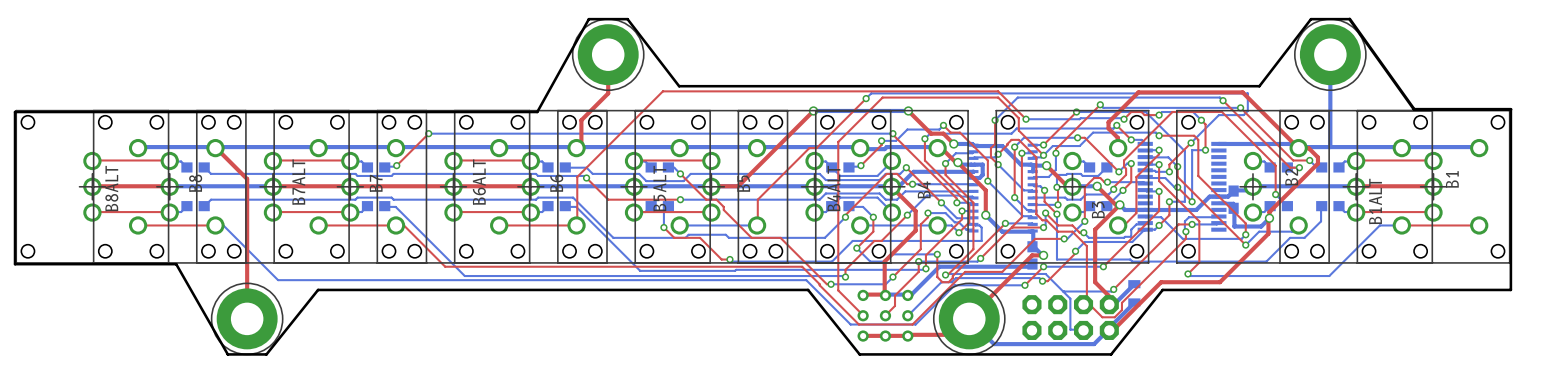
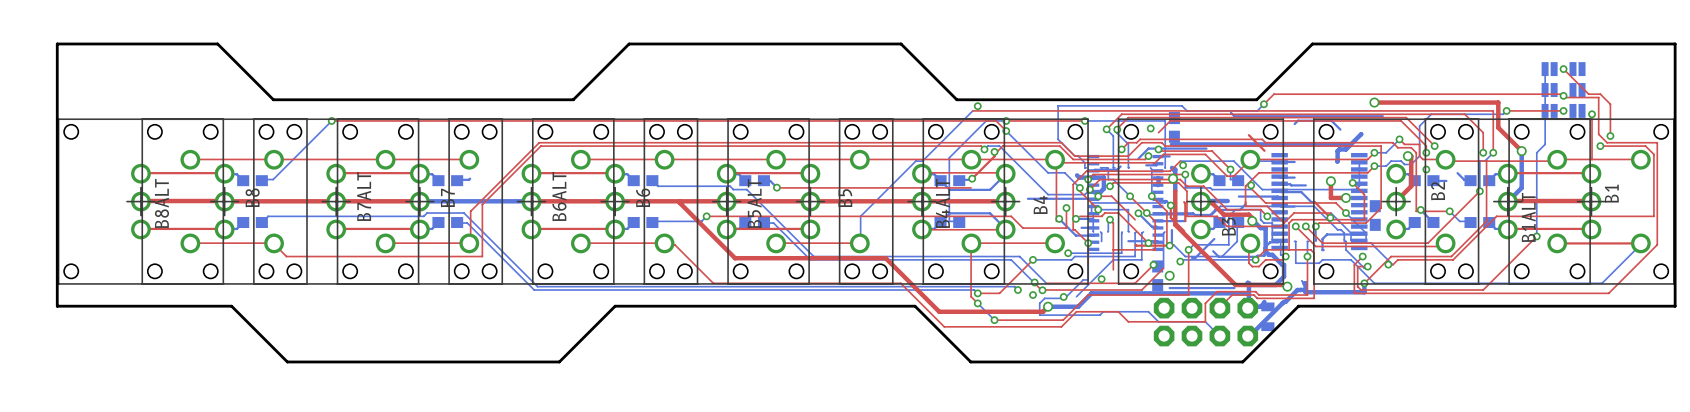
top track: (608, 54) (608, 93) (581, 120) (581, 143) (576, 148) -> none
part: (608, 54) -> none
bottom track: (1330, 54) (1330, 147) -> none
part: (1330, 54) -> none
bottom track: none -> (1545, 69) (1545, 144) (1536, 152) (1536, 236)
part: none -> (1549, 69)
top track: none -> (1563, 69) (1588, 94) (1600, 94) (1610, 104) (1610, 136)
via: none -> (1563, 69)
part: none -> (1577, 69)
part: none -> (1549, 90)
part: none -> (1577, 90)
via: none -> (1563, 95)
top track: none -> (1374, 102) (1498, 102) (1498, 127) (1521, 151)
via: none -> (1374, 102)
bottom track: none -> (1263, 104) (1257, 110) (1186, 110) (1181, 105) (1058, 105) (1058, 139) (1074, 156) (1078, 156) (1084, 162) (1086, 167)
top track: none -> (1263, 104) (1274, 94) (1561, 94) (1565, 97) (1598, 97) (1598, 134) (1607, 142) (1657, 142) (1657, 244) (1608, 293) (1354, 293) (1354, 264) (1362, 256)
via: none -> (1263, 104)
bottom track: (866, 98) (871, 93) (1247, 93) (1247, 110) (1243, 115) (1218, 115) (1191, 142) -> none
top track: (866, 98) (816, 148) (809, 148) (757, 199) (757, 225) -> (776, 243) (859, 243)
bottom track: (1223, 100) (1219, 97) (1017, 97) (995, 120) -> none
top track: (1223, 100) (1290, 167) (1299, 167) -> none
via: (1223, 100) -> none
top track: none -> (972, 110) (1493, 110) (1493, 152)
bottom track: none -> (1506, 110) (1503, 114) (1431, 114) (1419, 125) (1419, 156) (1411, 164) (1404, 164) (1401, 161) (1391, 161) (1386, 166) (1374, 166)
top track: none -> (1506, 110) (1563, 110)
via: none -> (1506, 110)
part: none -> (1549, 110)
via: none -> (1563, 110)
part: none -> (1577, 110)
top track: (1100, 104) (1055, 149) (1055, 153) -> none
via: (1100, 104) -> none
top track: none -> (1592, 114) (1592, 159)
via: none -> (1592, 114)
top track: (1240, 107) (1293, 160) (1309, 160) -> none
via: (1240, 107) -> none
board edge: (1510, 109) (1414, 109) (1349, 19) (1311, 19) (1259, 86) (679, 86) (627, 19) (588, 19) (537, 112) (15, 112) -> (1675, 117) (1675, 43) (1312, 43) (1256, 99) (956, 99) (901, 43) (629, 43) (573, 99) (273, 99) (217, 43) (57, 43) (57, 120)
bottom track: (813, 110) (908, 110) -> none
top track: (813, 110) (738, 186) (711, 186) -> (1005, 201) (810, 201)
via: (813, 110) -> none
top track: (908, 110) (931, 133) (943, 133) (953, 143) -> none
via: (908, 110) -> none
top track: none -> (331, 120) (996, 120) (1006, 131)
via: none -> (331, 120)
top track: none -> (1006, 120) (1084, 120)
via: none -> (1006, 120)
bottom track: none -> (1084, 120) (1165, 120) (1164, 167)
via: none -> (1084, 120)
bottom track: (1076, 112) (1145, 112) (1184, 151) (1184, 201) (1169, 201) -> none
top track: (1076, 112) (1043, 145) -> none
via: (1076, 112) -> none
top track: (1159, 115) (1144, 115) (1141, 112) (1131, 112) (1124, 119) -> none
via: (1159, 115) -> none
part: none -> (1174, 127)
bottom track: none -> (1106, 129) (1113, 136) (1113, 167) (1114, 167)
top track: none -> (1106, 129) (1121, 114) (1464, 114) (1483, 132) (1483, 152)
via: none -> (1106, 129)
bottom track: none -> (1116, 129) (1116, 132) (1128, 142) (1129, 167)
top track: none -> (1116, 129) (1128, 117) (1406, 117) (1434, 146)
bottom track: (1026, 119) (1124, 119) -> none
top track: (1026, 119) (998, 91) (662, 91) (577, 176) (577, 225) (499, 225) -> (1307, 256) (1307, 295) (1258, 295) (1255, 291) (1217, 291) (1205, 303) (1205, 321) (1128, 321) (1118, 311) (1076, 311) (1061, 326) (944, 326) (900, 283) (713, 283) (674, 244) (580, 243)
via: (1124, 119) -> none
top track: (995, 120) (995, 143) (990, 148) (990, 157) (998, 164) -> none
top track: (1201, 120) (1205, 124) (1205, 150) -> none
via: (1201, 120) -> none
bottom track: none -> (1006, 131) (1048, 172) (1064, 172) (1079, 187)
via: none -> (1006, 131)
top track: none -> (1158, 132) (1170, 120) (1401, 120) (1426, 146) (1426, 152)
bottom track: none -> (1361, 134) (1345, 149) (1337, 151) (1337, 161)
bottom track: (943, 125) (939, 129) (907, 129) (896, 140) (881, 140) -> none
top track: (943, 125) (950, 132) (960, 132) (987, 160) (987, 181) -> none
via: (943, 125) -> none
bottom track: (1116, 125) (1113, 128) (1016, 128) (1011, 133) (930, 133) (924, 138) -> none
via: (1116, 125) -> none
via: none -> (1610, 136)
bottom track: none -> (1399, 139) (1386, 152) (1374, 152)
top track: none -> (1399, 139) (1404, 144) (1419, 144) (1419, 156) (1422, 159) (1444, 159) (1446, 161) (1640, 159)
via: none -> (1399, 139)
bottom track: (428, 133) (892, 133) -> none
top track: (428, 133) (396, 165) -> none
via: (428, 133) -> none
top track: (892, 133) (956, 198) (956, 202) -> none
via: (892, 133) -> none
bottom track: none -> (1171, 144) (1350, 145)
bottom track: (1159, 135) (1156, 132) (1093, 132) (1079, 146) (1052, 146) (1041, 157) (1032, 158) -> none
top track: (1159, 135) (1194, 135) (1198, 139) (1198, 175) (1245, 223) (1245, 234) -> none
via: (1159, 135) -> none
via: none -> (1434, 146)
top track: none -> (1600, 146) (1645, 146) (1653, 154) (1653, 216) (1496, 216) (1453, 259) (1397, 259) (1392, 264)
via: none -> (1600, 146)
top track: (1077, 137) (1084, 137) (1118, 171) -> none
via: (1077, 137) -> none
bottom track: none -> (984, 149) (987, 146) (999, 146) (1048, 194) (1084, 194) (1089, 189)
via: none -> (984, 149)
top track: (924, 138) (924, 160) (969, 204) (969, 222) (958, 232) -> none
via: (924, 138) -> none
top track: none -> (1121, 149) (1128, 142) (1136, 142) (1140, 139) (1262, 139) (1265, 142) (1392, 142) (1397, 147) (1411, 147) (1416, 152) (1416, 211) (1449, 211)
via: none -> (1121, 149)
top track: none -> (1158, 149) (1160, 151) (1212, 151) (1230, 169)
via: none -> (1158, 149)
bottom track: (1131, 139) (1141, 139) (1145, 143) -> none
via: (1131, 139) -> none
via: none -> (1521, 151)
top track: none -> (996, 152) (1002, 146) (1059, 146) (1073, 159) (1145, 159) (1148, 156)
top track: none -> (1374, 152) (1367, 159) (1250, 159) (1233, 176) (1227, 176) (1205, 154) (1163, 154) (1155, 162) (1056, 162) (1055, 159)
via: none -> (1374, 152)
via: none -> (1426, 152)
via: none -> (1483, 152)
bottom track: none -> (1493, 152) (1484, 161) (1479, 161) (1479, 191)
via: none -> (1493, 152)
top track: (1191, 142) (1169, 164) (1169, 171) -> none
via: (1191, 142) -> none
bottom track: (953, 143) (1002, 146) (1020, 164) (1046, 165) -> none
via: (953, 143) -> none
bottom track: (1218, 143) (1294, 143) (1298, 148) (1479, 148) -> none
via: none -> (1148, 156)
top track: none -> (1407, 156) (1411, 156) (1411, 186) (1396, 201)
via: none -> (1407, 156)
via: (1043, 145) -> none
top track: (1014, 147) (1014, 197) -> none
via: (1014, 147) -> none
bottom track: (138, 148) (937, 148) -> none
top track: none -> (190, 159) (469, 159)
top track: (215, 148) (247, 179) (247, 318) -> none
top track: none -> (580, 159) (1055, 159)
top track: (937, 148) (941, 148) (957, 162) (985, 190) (985, 215) -> (1055, 159) (1056, 221)
bottom track: none -> (1250, 159) (1273, 161)
top track: (1118, 148) (1117, 137) (1108, 128) (1108, 122) (1138, 92) (1242, 92) (1297, 147) (1308, 148) (1317, 157) (1317, 163) (1269, 212) (1268, 233) (1219, 282) (1161, 282) (1113, 329) (1109, 330) -> none
bottom track: none -> (1180, 161) (1233, 161) (1262, 189) (1356, 189) (1359, 186) (1358, 161)
top track: none -> (1180, 161) (1170, 171) (1086, 171) (1073, 184) (1073, 229) (1088, 243) (1088, 263)
top track: none -> (1486, 161) (1486, 221) (1451, 256) (1391, 256) (1364, 283)
top track: (1159, 150) (1159, 154) (1136, 176) (1136, 213) (1124, 225) (1118, 225) -> (1285, 256) (1282, 259) (1265, 259) (1258, 266) (1252, 266) (1248, 263) (1250, 243)
via: (1159, 150) -> none
bottom track: (1205, 150) (1192, 150) (1192, 201) -> none
via: (1205, 150) -> none
bottom track: (973, 151) (955, 153) (945, 163) -> none
top track: (1021, 153) (1021, 217) (980, 258) -> none
via: (1021, 153) -> none
bottom track: (1055, 153) (1055, 169) (1048, 176) (1032, 178) -> none
top track: (998, 154) (1011, 139) (1018, 139) (1036, 157) (1036, 214) (1042, 220) (1046, 220) (1058, 231) (1072, 231) (1086, 246) (1086, 300) (1083, 304) (1086, 301) (1102, 317) (1114, 317) (1121, 310) (1121, 302) (1185, 238) (1185, 231) -> none
via: (998, 154) -> none
via: none -> (1374, 166)
bottom track: none -> (1100, 167) (1107, 167) (1108, 179) (1113, 179) (1130, 196)
bottom track: none -> (1150, 167) (1151, 196)
top track: (1043, 155) (1018, 130) (1018, 118) (998, 97) (882, 97) (838, 141) (838, 290) (863, 315) -> none
via: (1043, 155) -> none
bottom track: none -> (1172, 167) (1175, 169) (1175, 191)
via: none -> (1230, 169)
bottom track: (1145, 157) (1168, 157) (1177, 166) -> none
via: none -> (1426, 169)
via: (1309, 160) -> none
top track: none -> (921, 173) (1005, 173)
bottom track: none -> (1185, 174) (1185, 187) (1252, 189)
top track: none -> (1185, 174) (1093, 174) (1088, 179)
via: none -> (1185, 174)
via: (957, 162) -> none
top track: (945, 163) (945, 174) (973, 202) (973, 249) (945, 274) -> none
via: (945, 163) -> none
bottom track: (1131, 163) (1127, 163) (1118, 171) -> none
top track: (1131, 163) (1131, 182) (1123, 190) -> none
via: (1131, 163) -> none
bottom track: (998, 164) (1023, 190) (1032, 191) -> none
via: (998, 164) -> none
top track: (1159, 164) (1159, 181) (1199, 221) (1199, 262) (1187, 273) -> none
via: (1159, 164) -> none
via: (396, 165) -> none
top track: (1046, 165) (1067, 186) (1072, 186) -> (1252, 218) (1248, 214) (1223, 214) (1212, 202) (1200, 201)
via: none -> (1088, 179)
top track: (1177, 166) (1177, 176) (1245, 245) -> none
via: (1177, 166) -> none
bottom track: (204, 167) (211, 173) (355, 173) (357, 175) (391, 175) (393, 173) (536, 173) (538, 175) (584, 175) (586, 178) -> (261, 180) (273, 179) (331, 120)
bottom track: (565, 167) (586, 167) (592, 173) (639, 173) (646, 181) (683, 181) (690, 173) (819, 173) (825, 180) (879, 180) (885, 173) (900, 173) (906, 167) -> (652, 180) (658, 186) (730, 186) (733, 189) (746, 189) (813, 256) (1019, 256) (1046, 283)
top track: (906, 167) (941, 202) -> none
via: (906, 167) -> none
bottom track: (1106, 167) (1098, 175) (1082, 175) (1080, 173) (1056, 174) (1056, 187) -> (1238, 180) (1230, 179) (1230, 169)
top track: none -> (1330, 181) (1330, 197) (1345, 197)
via: none -> (1330, 181)
via: (1299, 167) -> none
top track: none -> (1352, 182) (1364, 194) (1364, 219) (1292, 219) (1289, 223) (1289, 249)
via: none -> (1352, 182)
bottom track: (973, 171) (913, 171) (899, 186) (891, 186) (530, 186) -> none
via: (1169, 171) -> none
top track: none -> (1110, 186) (1113, 182) (1178, 182) (1186, 191) (1186, 216) (1217, 216) (1227, 226) (1280, 226) (1294, 213) (1330, 213)
via: none -> (1110, 186)
top track: (680, 173) (706, 199) (716, 199) (723, 206) (723, 210) (751, 237) (780, 237) (826, 284) (831, 284) -> (776, 187) (971, 187)
top track: none -> (1079, 187) (1079, 191) (1098, 209)
via: none -> (1079, 187)
top track: none -> (1089, 189) (1099, 179) (1180, 179) (1186, 186) (1203, 186) (1227, 209) (1260, 209) (1267, 216)
via: none -> (1089, 189)
top track: none -> (1252, 189) (1265, 202) (1335, 202) (1345, 213)
top track: none -> (1175, 191) (1175, 224) (1235, 284) (1285, 284) (1287, 286)
top track: none -> (1479, 191) (1427, 243) (1322, 243) (1305, 226)
via: none -> (1479, 191)
top track: (586, 178) (608, 199) (680, 199) -> none
via: (586, 178) -> none
top track: none -> (1098, 196) (1111, 196) (1135, 219)
via: none -> (1098, 196)
bottom track: (987, 181) (1022, 216) (1032, 217) -> none
via: (987, 181) -> none
top track: none -> (1130, 196) (1155, 221) (1155, 249) (1113, 249)
via: none -> (1130, 196)
top track: none -> (1151, 196) (1166, 211) (1166, 244) (1173, 244)
via: none -> (1151, 196)
top track: (1107, 182) (1104, 182) (1100, 178) (1094, 178) (1084, 187) (1084, 221) -> none
via: (1107, 182) -> none
via: none -> (1345, 197)
top track: (912, 184) (907, 184) (897, 173) (886, 173) (845, 217) -> none
via: (912, 184) -> none
bottom track: (169, 186) (272, 186) -> none
top track: none -> (224, 201) (419, 201)
top track: (272, 186) (530, 186) -> none
bottom track: none -> (419, 201) (531, 201)
top track: none -> (679, 201) (735, 258) (885, 258) (939, 311) (1043, 311) (1048, 306)
top track: none -> (810, 201) (531, 201)
top track: (891, 186) (915, 211) (915, 230) (884, 261) (885, 295) (863, 295) -> none
bottom track: none -> (1166, 201) (1165, 202) (1091, 202) (1093, 231)
top track: (1097, 186) (1116, 205) (1119, 204) (1095, 229) (1095, 282) (1108, 295) (1109, 304) -> none
via: (1097, 186) -> none
bottom track: (1356, 186) (1254, 186) (1249, 190) (1235, 190) (1228, 196) (1218, 196) -> (1507, 201) (1521, 187) (1521, 151)
via: (1056, 187) -> none
top track: (1113, 187) (1126, 174) (1124, 160) (1172, 112) (1222, 112) (1275, 165) (1275, 194) -> (1245, 202) (1245, 186) (1258, 172) (1367, 172) (1374, 166)
via: (1177, 187) -> none
top track: none -> (1245, 204) (1245, 206) (1267, 206) (1284, 223)
via: (1113, 189) -> none
bottom track: (1123, 190) (1106, 206) -> (1173, 244) (1185, 256) (1222, 256) (1237, 241) (1238, 222)
via: (1123, 190) -> none
bottom track: (973, 191) (905, 191) (897, 199) (885, 199) (879, 193) (825, 193) (819, 199) (680, 199) -> none
top track: (1159, 191) (1159, 211) (1103, 266) -> none
via: (1159, 191) -> none
top track: none -> (1066, 208) (1066, 228) (1022, 228) (1011, 216) (706, 216)
via: none -> (1066, 208)
bottom track: none -> (1098, 209) (1128, 209) (1129, 231)
via: none -> (1098, 209)
via: none -> (1449, 211)
bottom track: (1218, 196) (1209, 196) (1196, 210) (1125, 210) (1119, 204) -> none
bottom track: (973, 197) (960, 195) (926, 195) (907, 215) -> none
bottom track: none -> (1146, 213) (1148, 214) (1212, 214) (1220, 206) (1314, 206) (1337, 229) (1344, 233) (1345, 249) (1364, 268) (1367, 266)
via: none -> (1146, 213)
bottom track: none -> (1330, 213) (1351, 233) (1351, 241)
bottom track: none -> (1345, 213) (1366, 233) (1364, 241) (1371, 243) (1392, 264)
via: none -> (1345, 213)
via: (680, 199) -> none
via: none -> (706, 216)
top track: none -> (1079, 216) (1101, 216) (1104, 213) (1118, 213) (1148, 243)
via: none -> (1267, 216)
top track: (1169, 201) (1169, 215) (1159, 225) -> none
via: (1169, 201) -> none
bottom track: none -> (1252, 218) (1260, 228) (1265, 228) (1265, 251) (1284, 264) (1284, 276) (1275, 284) (1250, 284) (1247, 282) (1247, 308) (1260, 306) (1264, 302)
bottom track: none -> (1110, 219) (1108, 219) (1107, 231)
top track: none -> (1110, 219) (1113, 223) (1113, 269)
via: none -> (1110, 219)
bottom track: (1218, 203) (1233, 203) (1234, 226) (1261, 226) (1269, 218) -> none
via: (1058, 204) -> none
bottom track: (204, 206) (211, 199) (355, 199) (357, 197) (391, 197) (393, 199) (536, 199) (538, 197) (573, 197) (613, 237) (685, 237) (688, 234) (725, 234) (728, 237) (824, 237) (845, 217) -> (261, 222) (268, 216) (423, 216) (427, 213) (463, 213) (537, 286) (1014, 286) (1017, 290)
bottom track: (384, 206) (395, 206) (464, 276) (845, 277) -> (457, 222) (467, 223) (534, 290) (974, 290) (977, 293)
bottom track: (565, 206) (576, 206) (640, 270) (925, 268) -> (652, 222) (701, 221) (706, 216)
bottom track: (668, 206) (663, 206) (663, 227) -> (763, 222) (773, 223) (810, 259) (1011, 259) (1036, 284)
bottom track: (848, 206) (863, 206) (873, 217) -> (959, 222) (949, 221) (949, 157) (986, 120) (1006, 120)
bottom track: (1321, 206) (1321, 221) (1304, 237) (1290, 237) (1266, 261) (1056, 259) (1056, 214) -> (1470, 222) (1459, 221) (1449, 211)
top track: none -> (1295, 226) (1315, 246) (1443, 246) (1445, 243)
via: none -> (1295, 226)
via: none -> (1305, 226)
bottom track: none -> (1315, 226) (1315, 241)
via: none -> (1315, 226)
top track: (962, 211) (962, 219) (925, 255) (925, 268) -> none
via: (962, 211) -> none
top track: none -> (921, 229) (1005, 229)
bottom track: (928, 213) (945, 213) (954, 222) (958, 222) (966, 229) (973, 230) -> none
top track: (928, 213) (928, 217) (920, 224) (920, 249) (892, 277) -> none
via: (928, 213) -> none
top track: (1045, 213) (1058, 225) (1072, 225) (1079, 232) (1083, 232) -> none
via: (1045, 213) -> none
bottom track: none -> (1100, 231) (1101, 241)
bottom track: none -> (1122, 231) (1121, 253) (1068, 253)
bottom track: none -> (1136, 231) (1135, 256) (1074, 256) (1071, 259) (1033, 259)
bottom track: none -> (1143, 231) (1141, 233) (1141, 259) (1113, 259) (1076, 296)
bottom track: none -> (1164, 231) (1163, 268)
via: (1056, 214) -> none
top track: (907, 215) (881, 240) (874, 240) (845, 269) (845, 277) -> none
via: (907, 215) -> none
bottom track: (985, 215) (1002, 231) (1032, 230) (1032, 246) (1043, 255) -> none
via: (985, 215) -> none
bottom track: (1145, 216) (1161, 217) (1182, 238) (1241, 238) (1245, 234) -> none
via: (845, 217) -> none
top track: (873, 217) (873, 231) (856, 248) -> none
via: (873, 217) -> none
via: (1269, 218) -> none
top track: none -> (1536, 236) (1483, 290) (1361, 290) (1357, 286) (1357, 266) (1367, 266)
via: none -> (1536, 236)
via: (1084, 221) -> none
top track: (1005, 223) (948, 282) (942, 282) (937, 277) (937, 254) -> none
via: (1005, 223) -> none
bottom track: none -> (1273, 241) (1272, 223) (1263, 223) (1260, 219) (1260, 209) (1235, 209) (1228, 216) (1228, 244) (1193, 244) (1188, 249)
bottom track: none -> (1280, 241) (1280, 254) (1285, 256)
bottom track: none -> (1294, 241) (1295, 263) (1319, 263) (1322, 259) (1351, 259) (1374, 283) (1602, 283) (1640, 243)
bottom track: none -> (1308, 241) (1307, 256)
bottom track: (1218, 223) (1192, 224) -> none
bottom track: (973, 224) (981, 227) (981, 240) (852, 240) (832, 261) (732, 261) (729, 259) -> none
top track: (1192, 224) (1178, 224) (1113, 289) -> none
via: (1192, 224) -> none
top track: (138, 225) (215, 225) -> (190, 243) (273, 243) (286, 256) (482, 256) (482, 204) (540, 146) (981, 146) (984, 149)
bottom track: (215, 225) (223, 225) (278, 280) (806, 280) (850, 324) (915, 324) (954, 285) (1024, 285) -> none
top track: (318, 225) (403, 225) (445, 266) (802, 266) (858, 324) (912, 324) (965, 271) (1002, 271) (1035, 238) (1064, 238) -> (385, 243) (470, 243) (470, 211) (539, 142) (1061, 142) (1074, 156) (1128, 156) (1141, 142) (1161, 142) (1165, 146) (1381, 146) (1381, 208) (1366, 223) (1319, 223) (1315, 226)
bottom track: (679, 225) (757, 225) -> (972, 110) (922, 161) (915, 161) (860, 216) (859, 243)
bottom track: (860, 225) (951, 225) (958, 232) -> none
top track: none -> (1055, 243) (971, 243) (971, 296) (977, 303)
via: none -> (1088, 243)
via: none -> (1148, 243)
bottom track: (1159, 225) (1154, 229) (1143, 230) (1132, 241) (1084, 241) (1075, 251) -> none
via: (1159, 225) -> none
bottom track: (1298, 225) (1292, 231) (1259, 231) (1245, 245) -> none
bottom track: (1401, 225) (1379, 225) (1329, 276) (1190, 276) (1187, 273) -> none
top track: (663, 227) (674, 237) (700, 237) (721, 259) (729, 259) -> none
via: (663, 227) -> none
top track: none -> (1188, 249) (1188, 295) (1088, 295) (1063, 320) (994, 320)
via: none -> (1188, 249)
via: (1185, 231) -> none
via: (958, 232) -> none
via: (1083, 232) -> none
via: none -> (1068, 253)
via: (1245, 234) -> none
via: none -> (1285, 256)
via: none -> (1307, 256)
via: none -> (1362, 256)
via: (1064, 238) -> none
top track: none -> (1033, 259) (999, 293) (977, 293)
via: none -> (1033, 259)
bottom track: none -> (1255, 259) (1181, 259) (1180, 261)
top track: none -> (1255, 259) (1265, 249) (1310, 249) (1314, 253) (1314, 298) (1257, 298) (1253, 295) (1232, 295) (1219, 308)
via: none -> (1255, 259)
via: none -> (1180, 261)
bottom track: none -> (1088, 263) (1088, 279) (1083, 279) (1064, 298) (1044, 298) (1039, 303) (1039, 315) (1099, 315) (1103, 311) (1148, 311) (1158, 321) (1205, 321) (1219, 336)
top track: none -> (1153, 264) (1135, 283) (1046, 283)
via: none -> (1153, 264)
via: none -> (1367, 266)
bottom track: (856, 248) (870, 261) (883, 261) (890, 254) (937, 254) -> none
via: (856, 248) -> none
top track: none -> (1163, 268) (1141, 290) (1041, 290) (1036, 284)
top track: (1075, 251) (1047, 281) (1042, 281) -> none
via: (1075, 251) -> none
via: (937, 254) -> none
top track: (1043, 255) (1032, 255) (953, 334) (863, 336) -> none
bottom track: (980, 258) (977, 261) (918, 261) -> none
via: (729, 259) -> none
bottom track: none -> (1301, 280) (1305, 283) (1305, 292) (1364, 292) (1364, 283)
top track: (918, 261) (918, 271) (895, 295) (895, 305) (885, 315) -> none
via: none -> (1364, 283)
board edge: (15, 264) (176, 264) (227, 354) (266, 354) (318, 289) (808, 289) (859, 354) (1111, 354) (1162, 289) (1510, 289) (1510, 283) -> (57, 285) (57, 306) (231, 306) (287, 361) (559, 361) (615, 306) (915, 306) (970, 361) (1242, 361) (1298, 306) (1675, 306)
bottom track: (1032, 264) (1030, 266) (939, 266) (911, 294) (885, 295) -> none
via: none -> (1287, 286)
top track: (1043, 266) (1024, 285) -> none
via: (1043, 266) -> none
via: (1103, 266) -> none
via: none -> (1017, 290)
bottom track: none -> (1301, 289) (1297, 290) (1247, 336)
via: none -> (977, 293)
bottom track: none -> (1248, 293) (1091, 293) (1078, 306) (1048, 306)
via: none -> (1033, 295)
via: (1187, 273) -> none
bottom track: (945, 274) (1045, 273) (1070, 298) (1070, 329) (1083, 330) -> none
via: (845, 277) -> none
bottom track: (892, 277) (885, 284) (831, 284) -> none
via: (892, 277) -> none
bottom track: none -> (977, 303) (994, 320)
via: none -> (977, 303)
bottom track: (1042, 281) (1039, 278) (955, 278) (951, 282) (941, 282) (907, 315) -> none
via: (1042, 281) -> none
via: (831, 284) -> none
via: none -> (1048, 306)
bottom track: (1134, 284) (1114, 303) (1109, 304) -> none
via: (1024, 285) -> none
bottom track: (1113, 289) (1111, 291) (1063, 292) -> none
via: (1113, 289) -> none
via: none -> (994, 320)
bottom track: (1134, 302) (1094, 344) (994, 344) (969, 318) -> none
part: (885, 315) -> none
part position: (1070, 317) -> (1205, 322)
part: (247, 318) -> none
part: (969, 318) -> none

